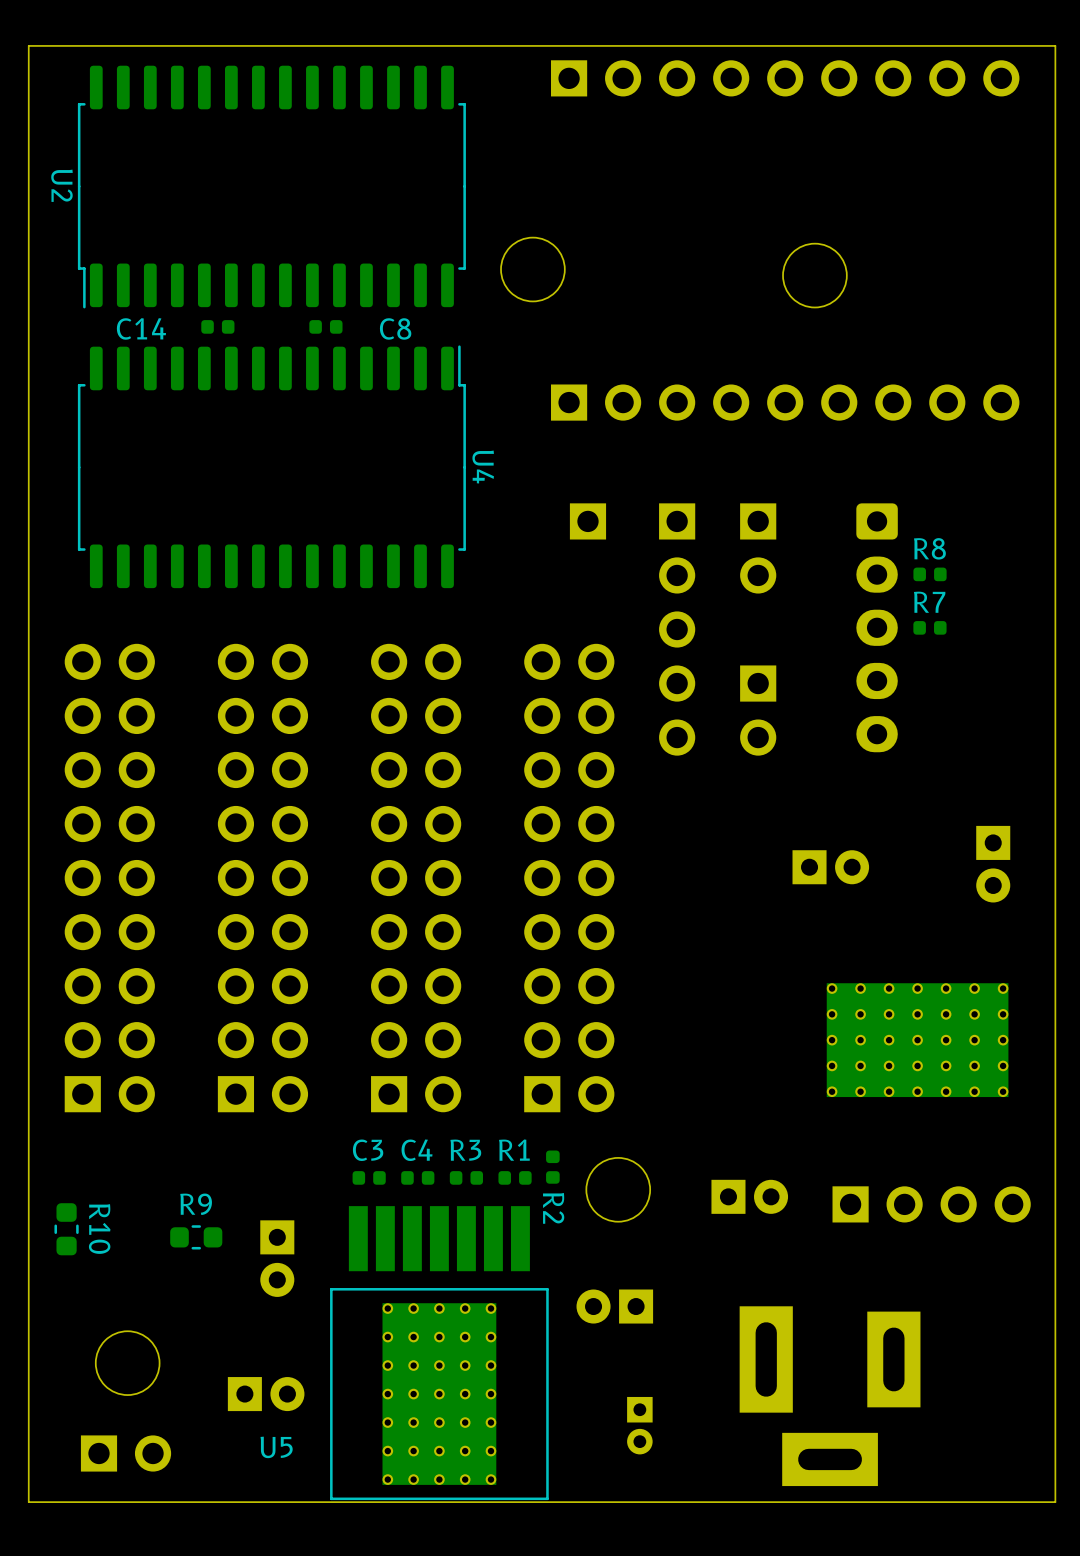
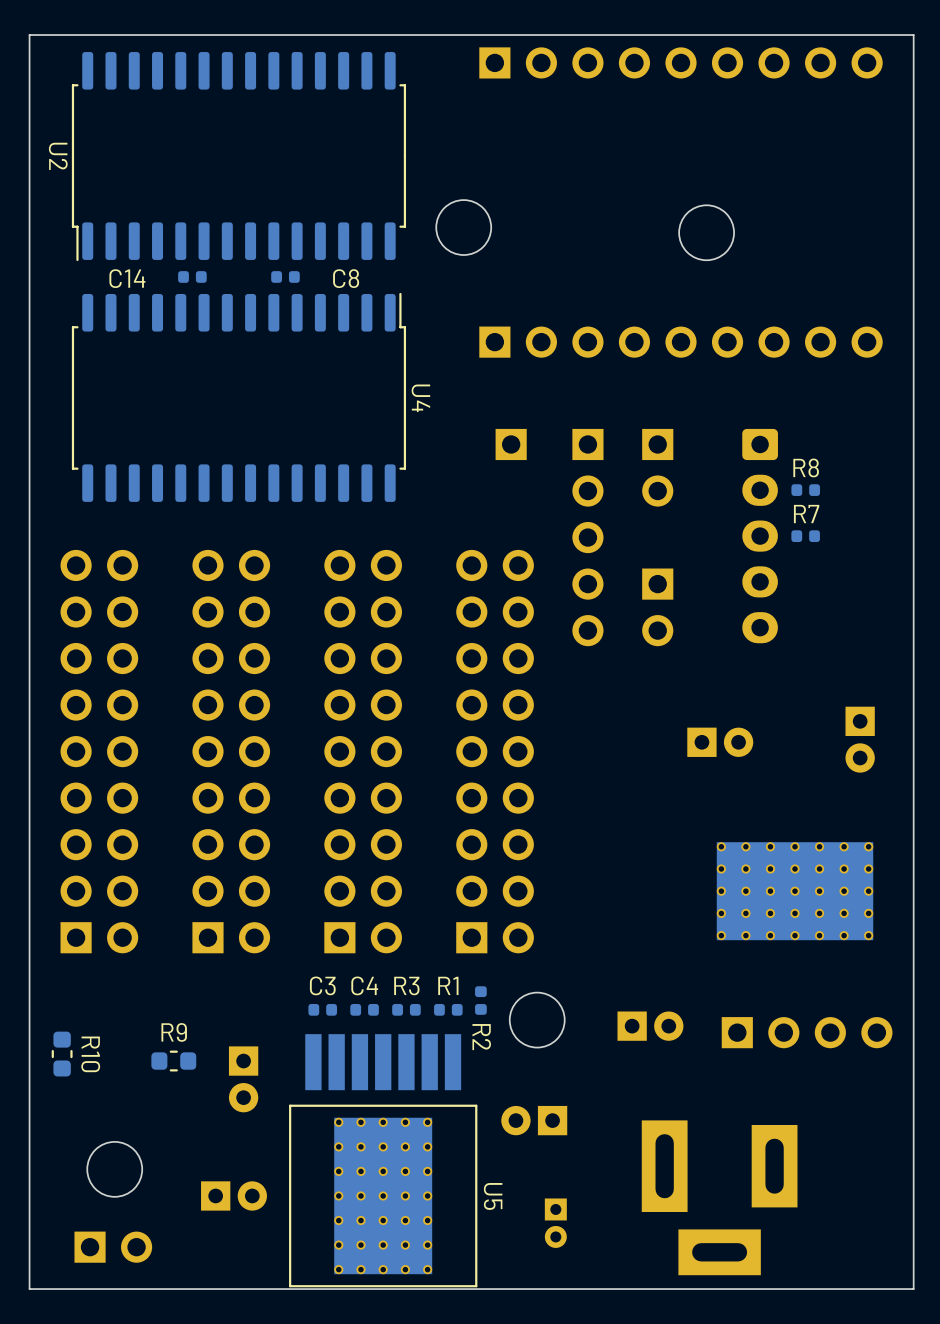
U5 name rotation: 0° (276, 1447) -> 90° clockwise (493, 1196)
U5 name position: U5 (276, 1447) -> U5 (493, 1196)

